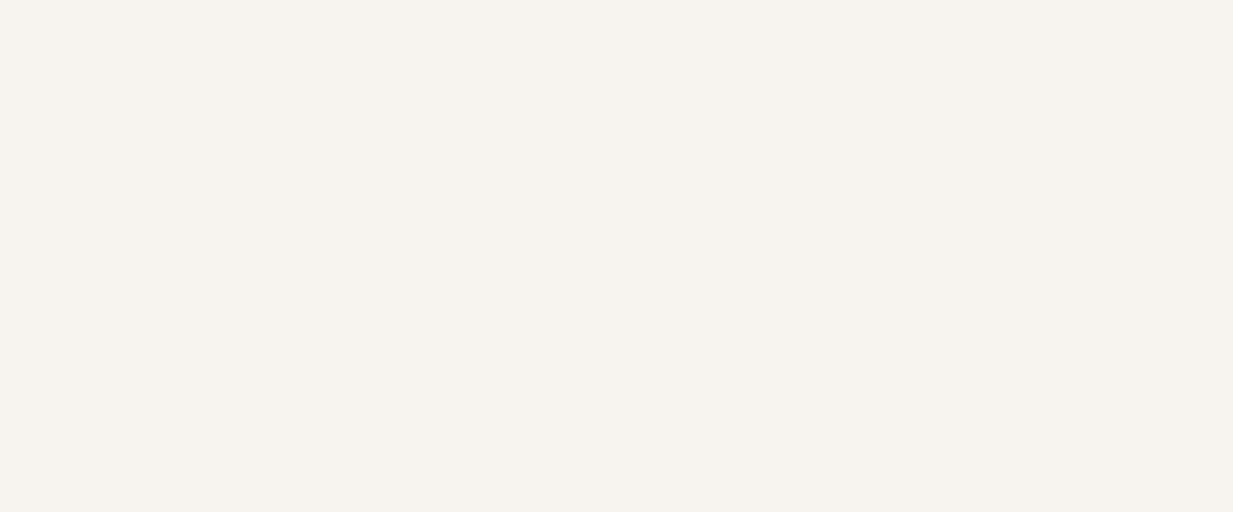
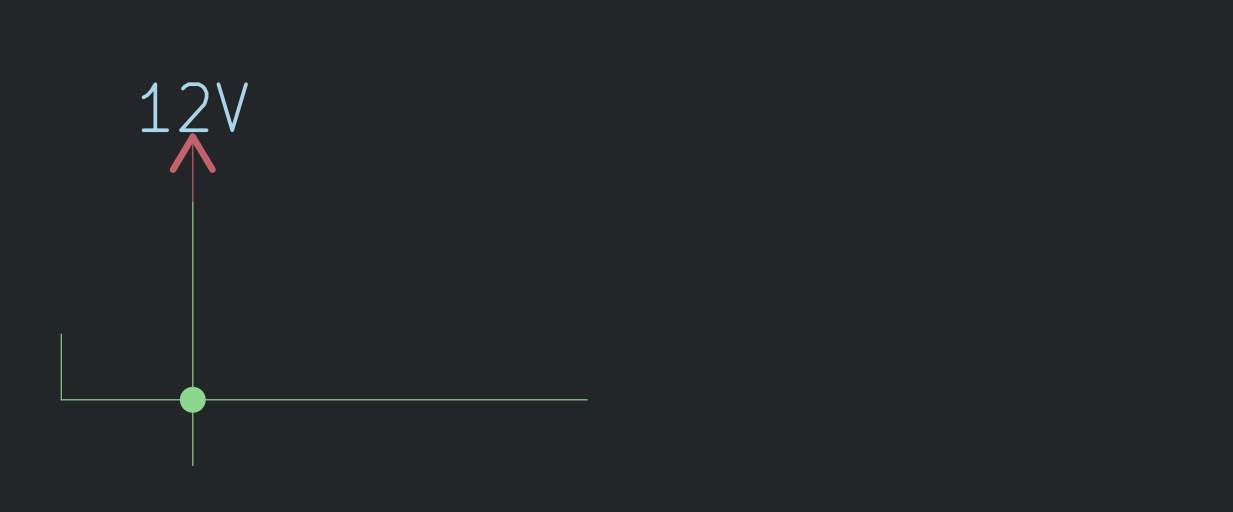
power symbol: none -> 12V (192, 168)
wire: none -> (192, 202) (192, 465)
wire: none -> (61, 334) (61, 399) (587, 399)
junction: none -> (192, 399)

